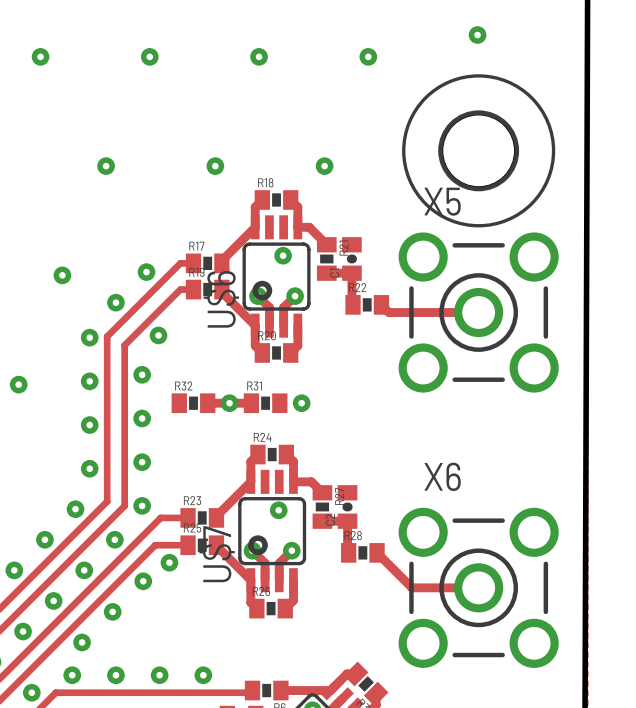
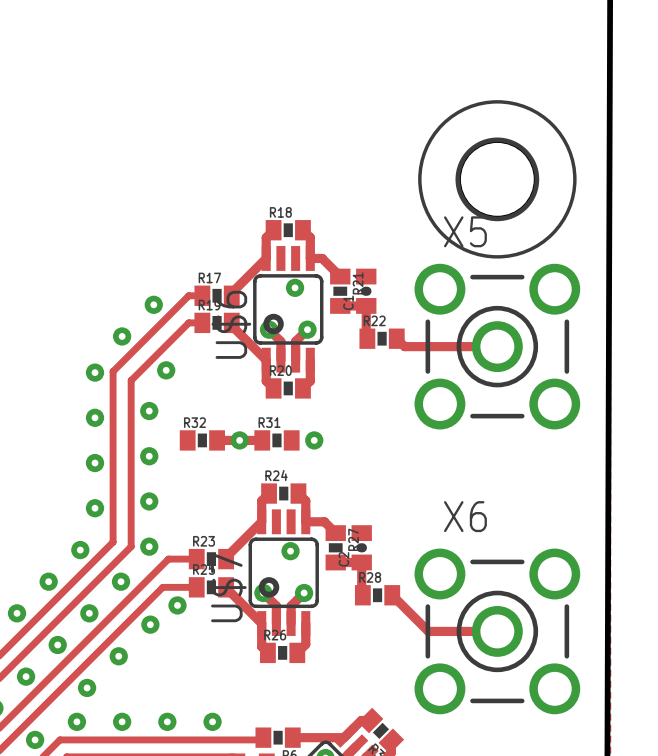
via: (477, 35) -> none
via: (40, 56) -> none
via: (149, 56) -> none
via: (259, 56) -> none
via: (368, 56) -> none
via: (106, 166) -> none
via: (215, 166) -> none
via: (324, 166) -> none
via: (62, 275) -> none
via: (18, 384) -> none

